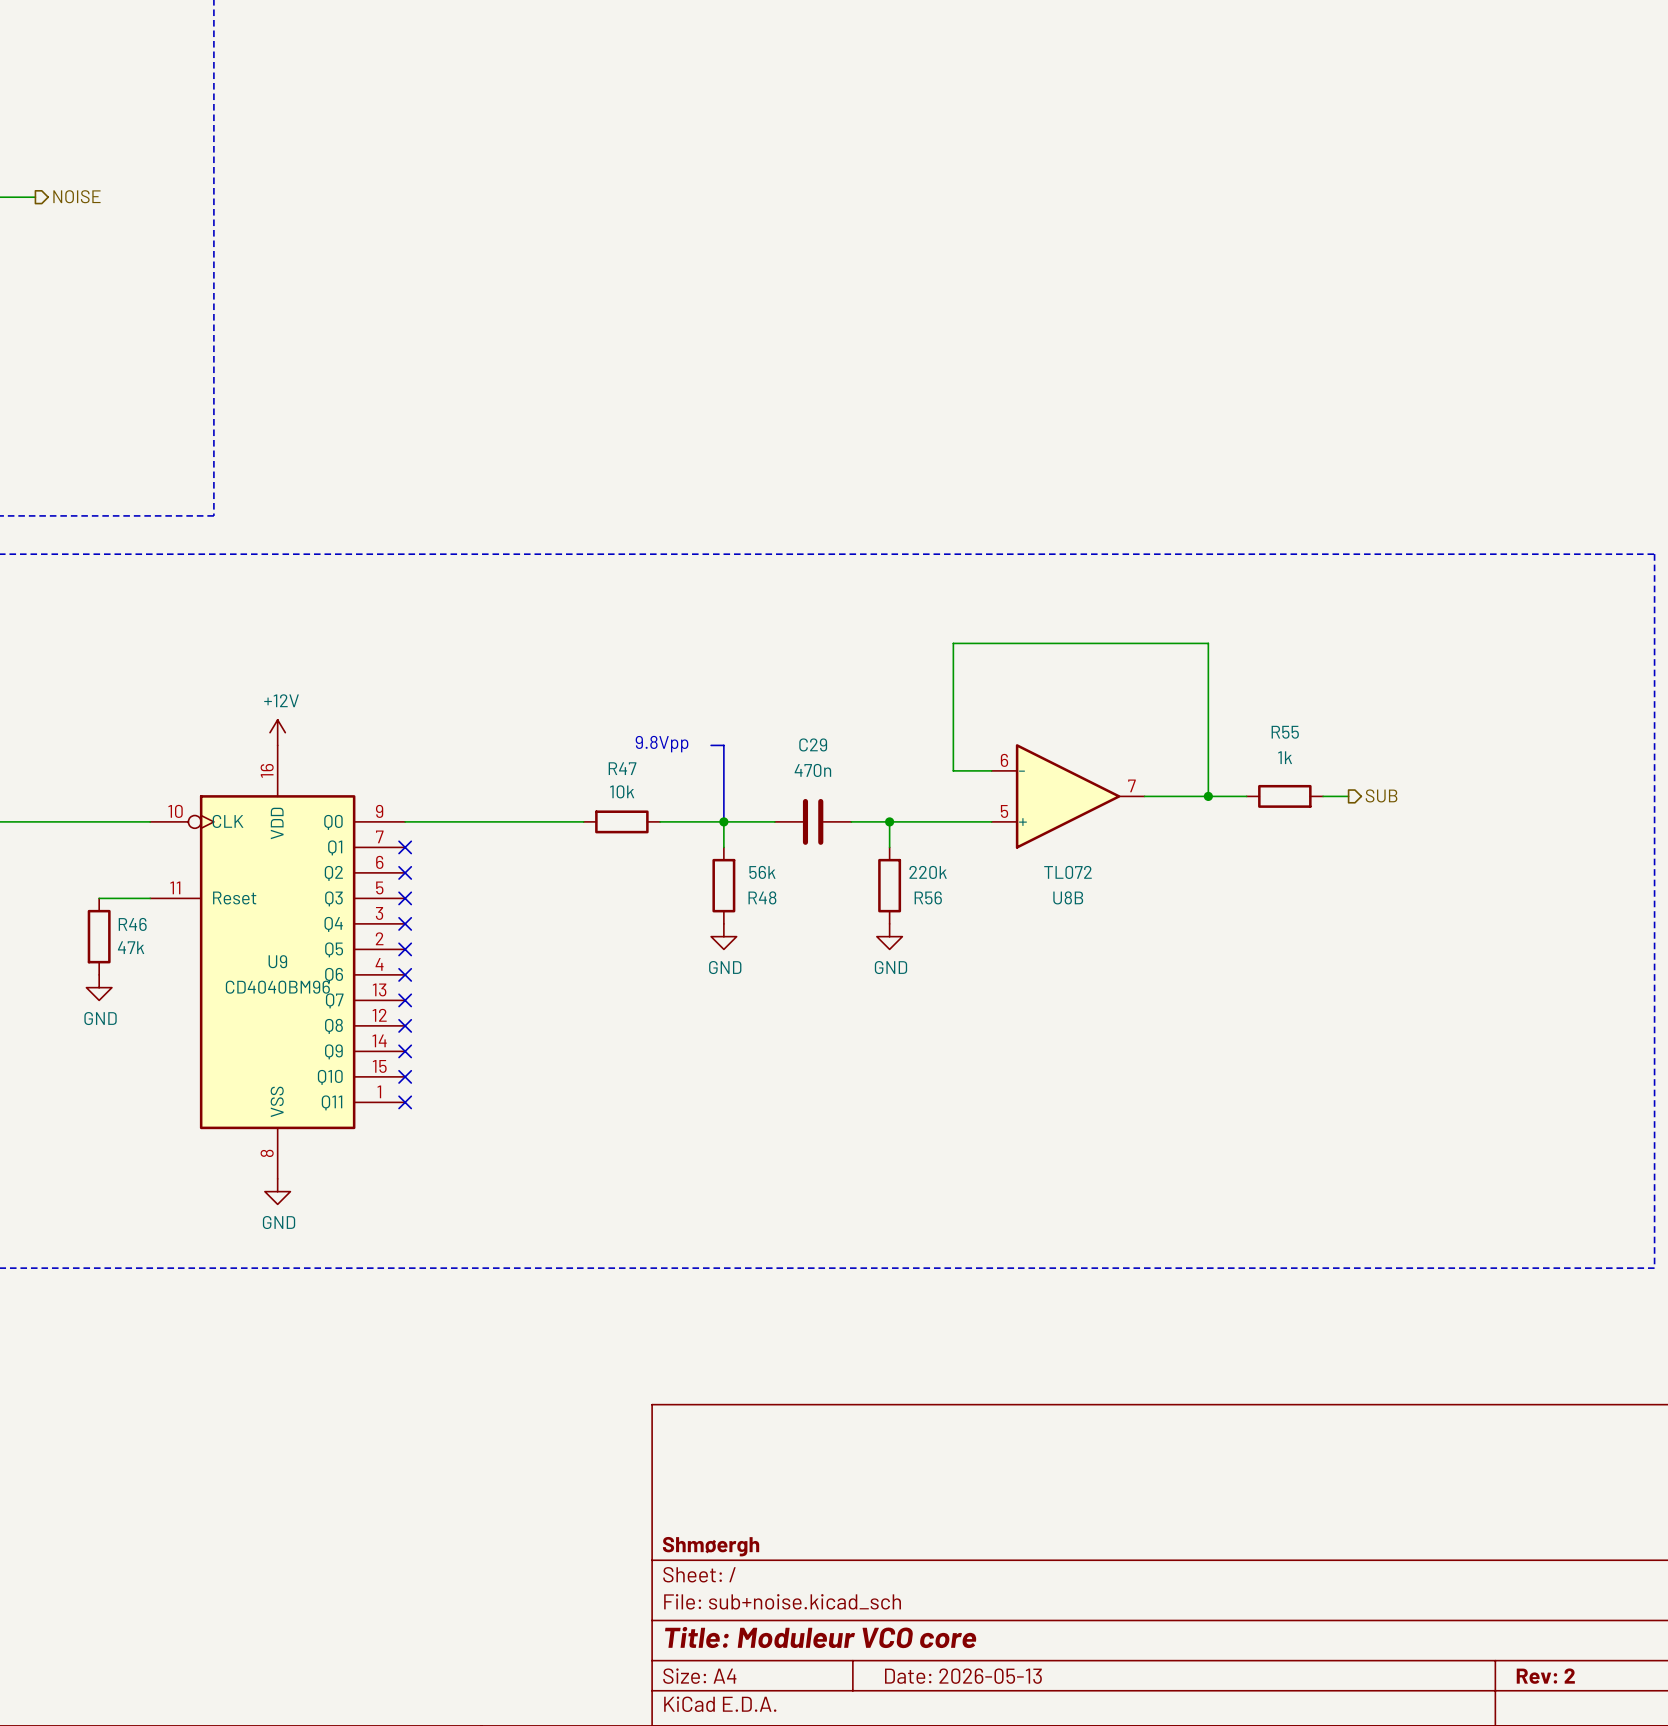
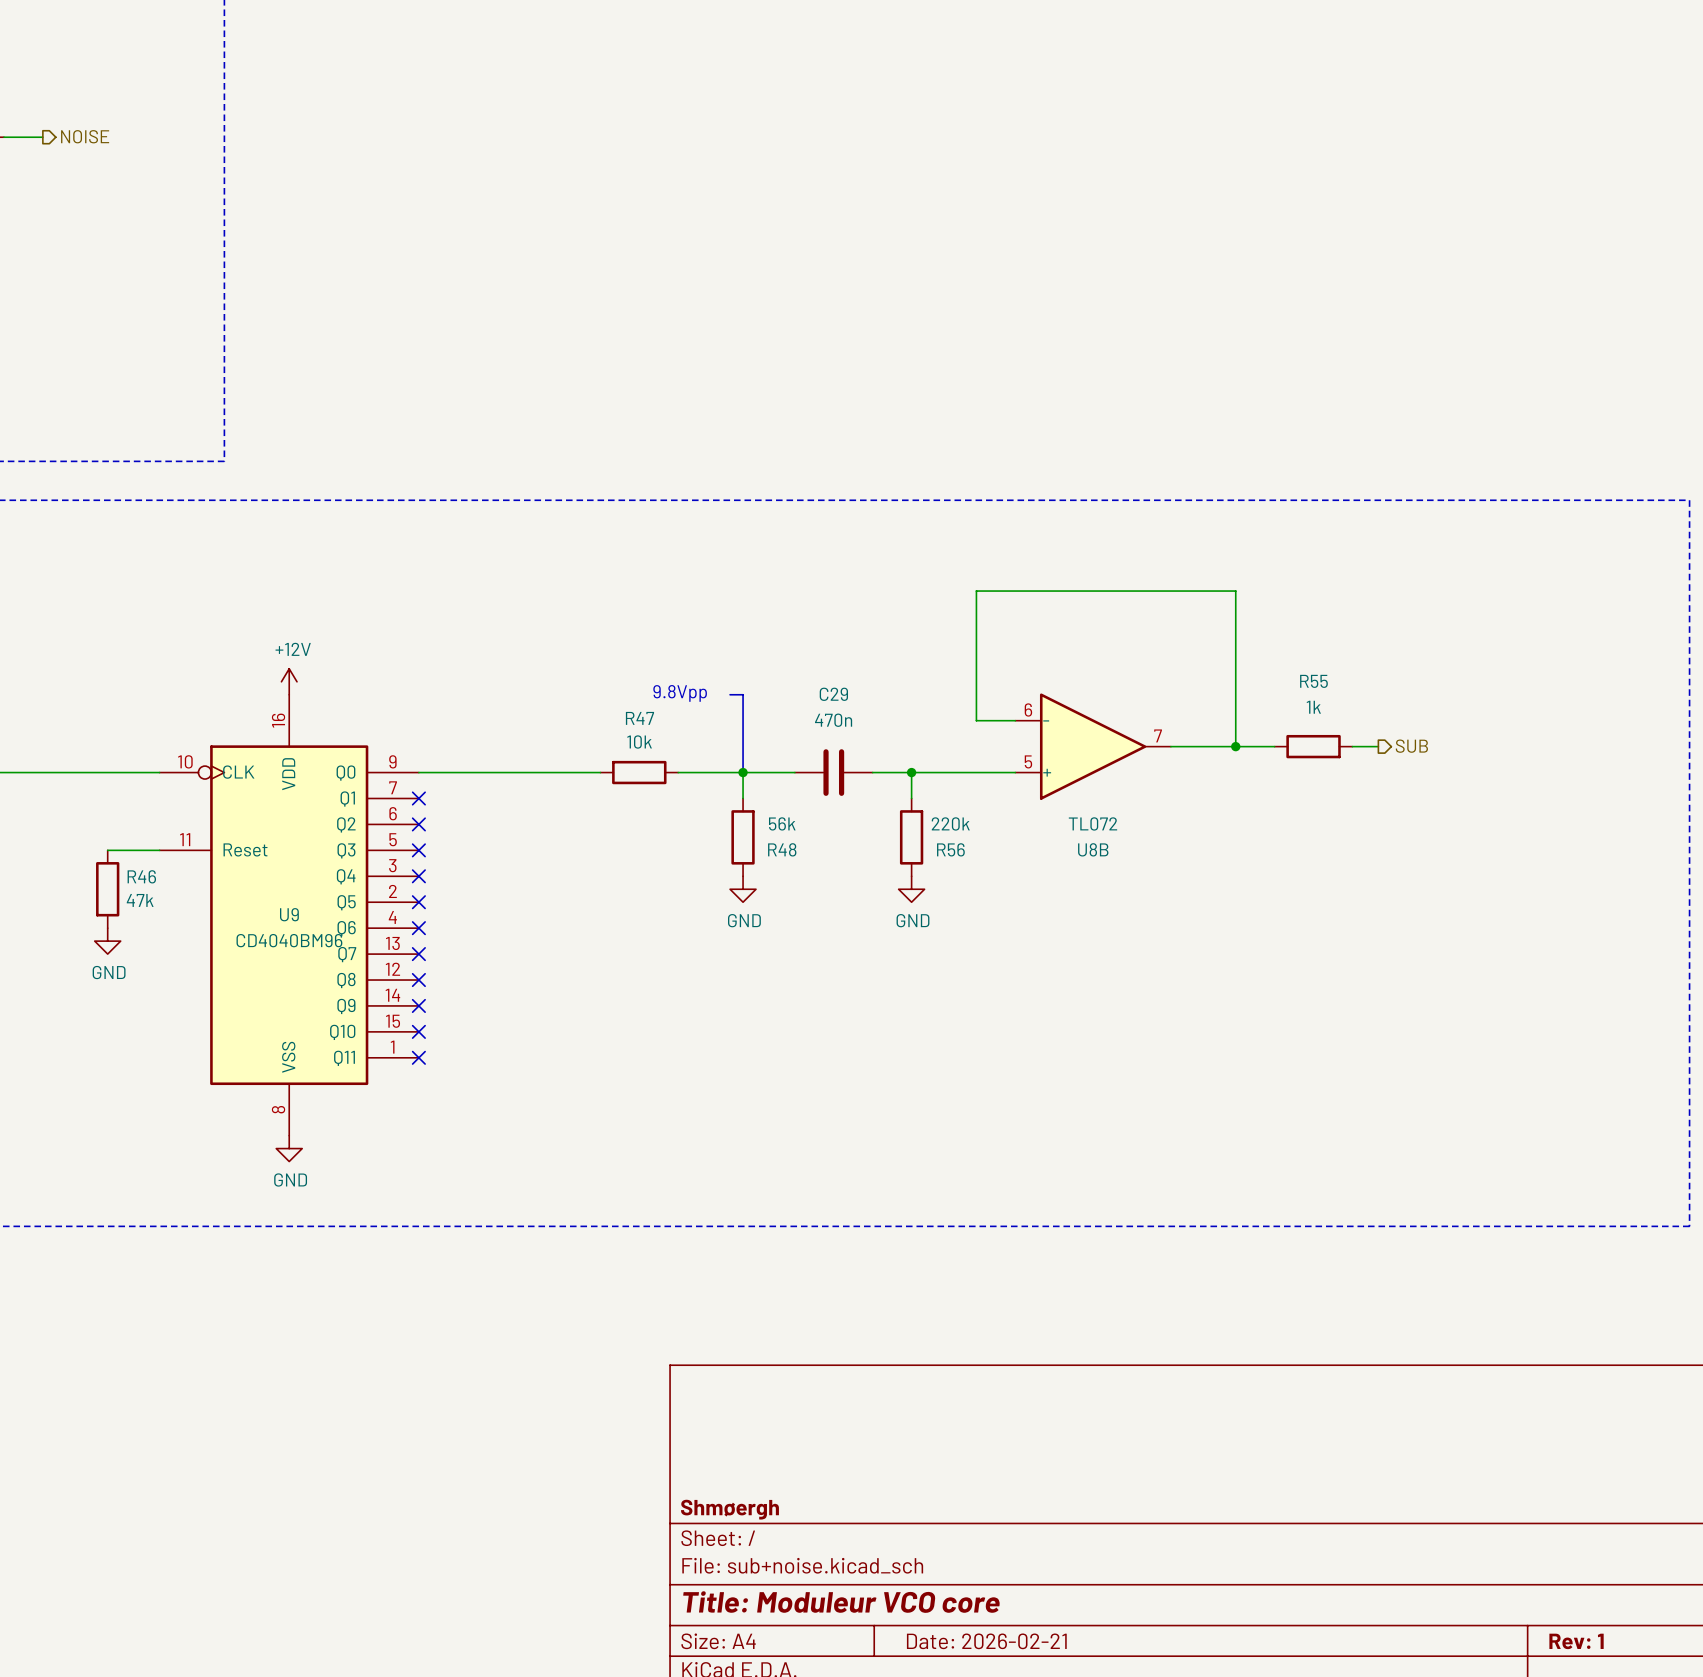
title block: Date: 2026-05-13 (963, 1676) -> Date: 2026-02-21 (986, 1641)
title block: Rev: 2 (1545, 1676) -> Rev: 1 (1576, 1641)

